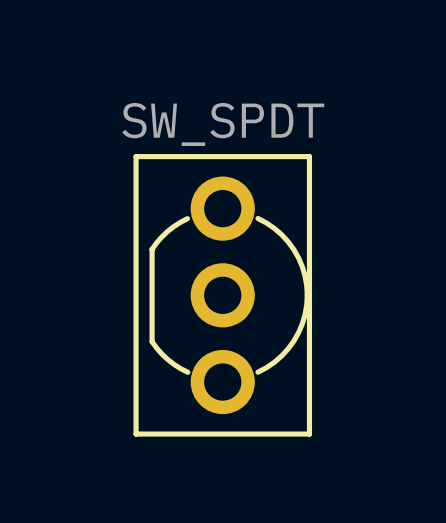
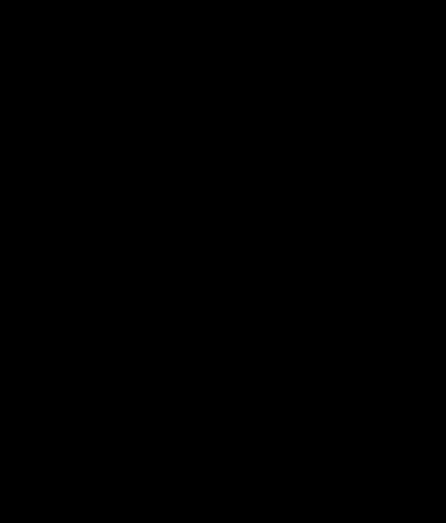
part: SW_SPDT (222, 295) -> none

